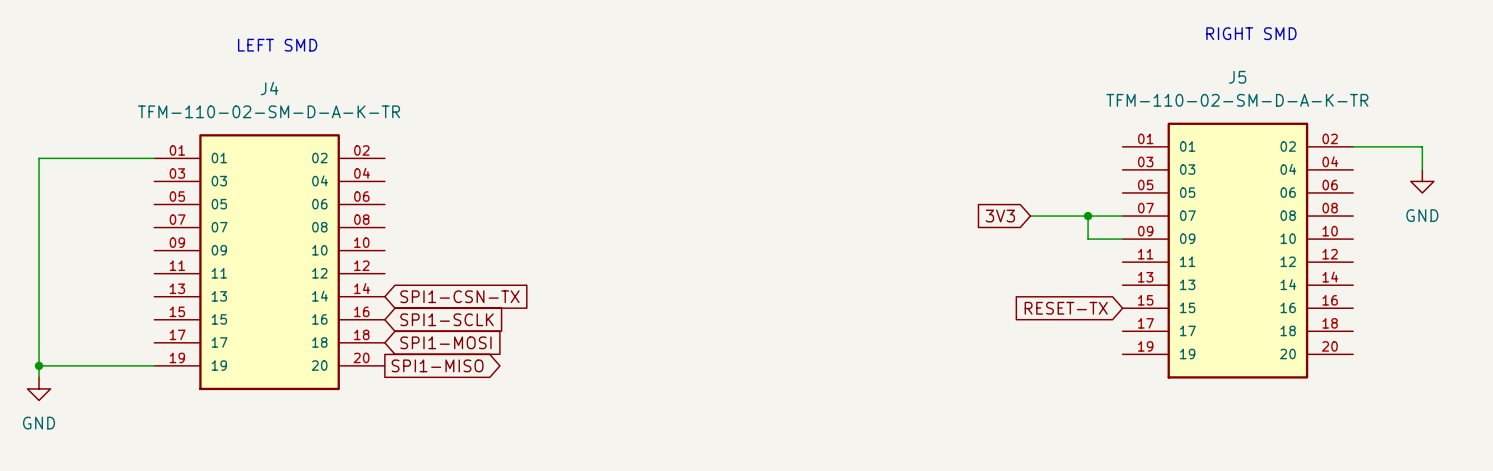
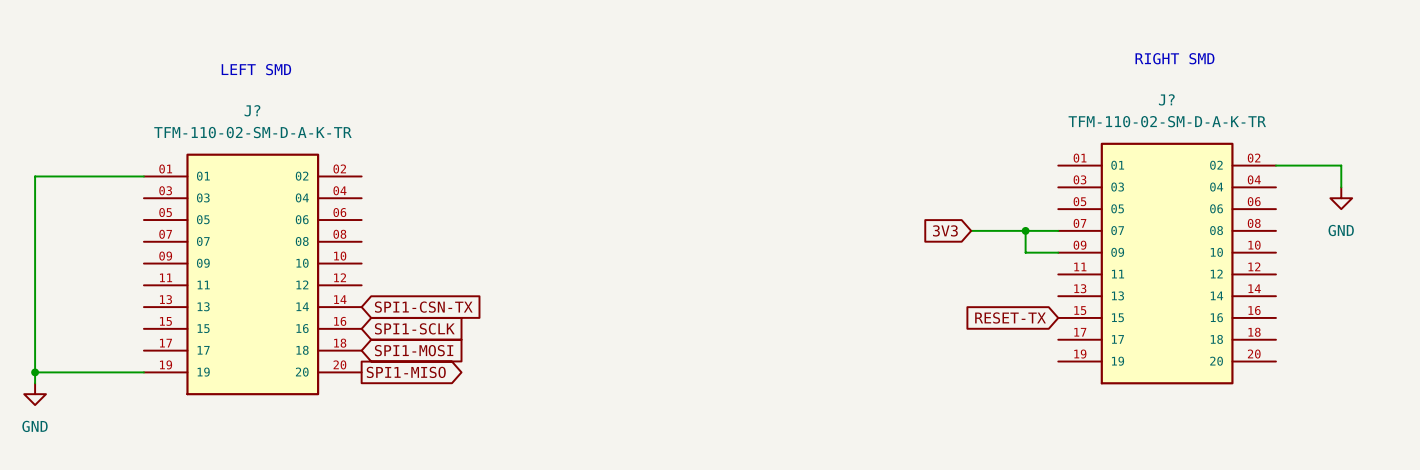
J5 name: J5 (1237, 77) -> J? (1166, 99)
J4 name: J4 (269, 88) -> J? (252, 110)

